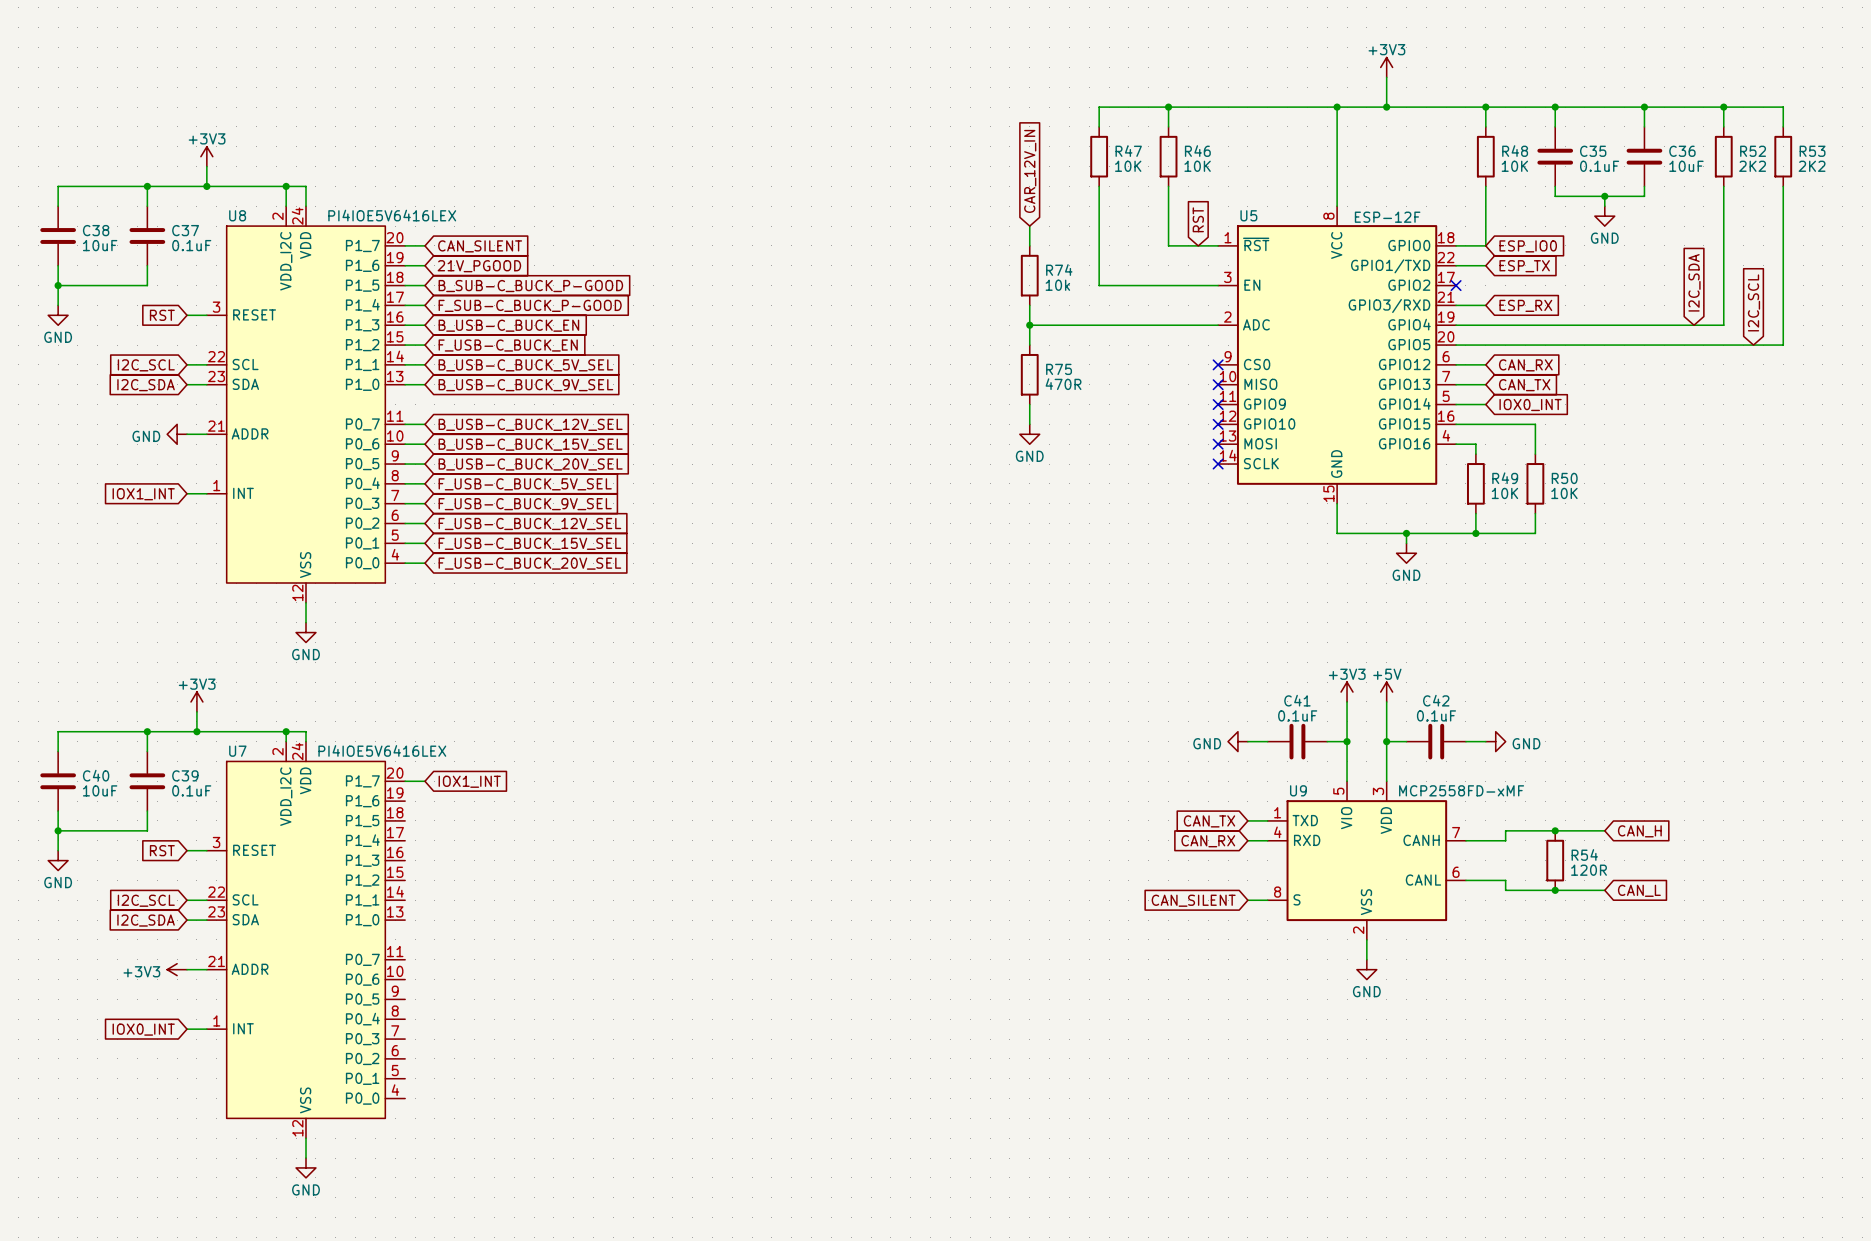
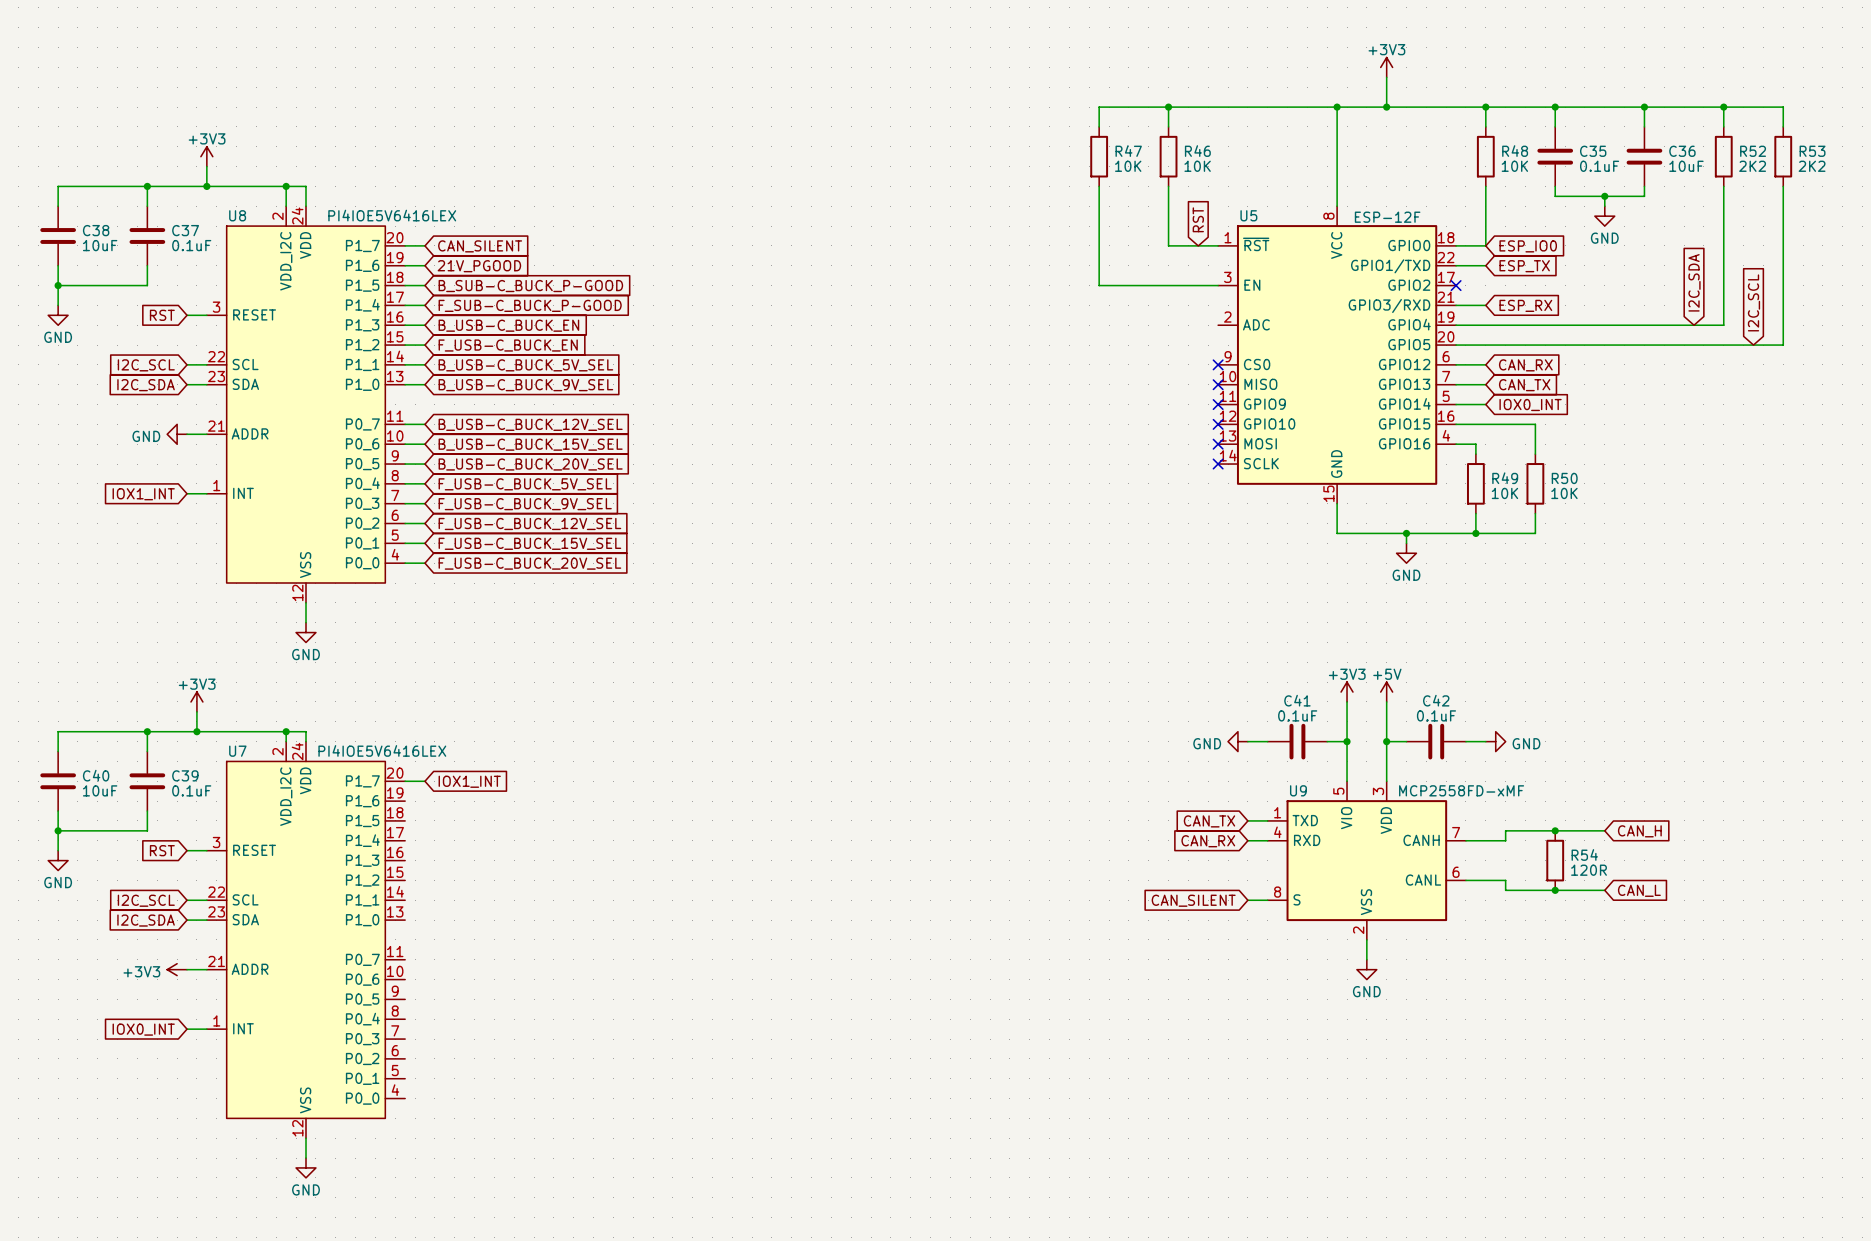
global label: CAR_12V_IN (1030, 171) -> none
wire: (1029, 226) (1029, 245) -> none
R74: 10k (1029, 275) -> none
wire: (1029, 305) (1029, 345) -> none
wire: (1029, 325) (1218, 325) -> none
junction: (1029, 325) -> none
R75: 470R (1029, 374) -> none
wire: (1029, 404) (1029, 424) -> none
power symbol: GND (1029, 434) -> none

